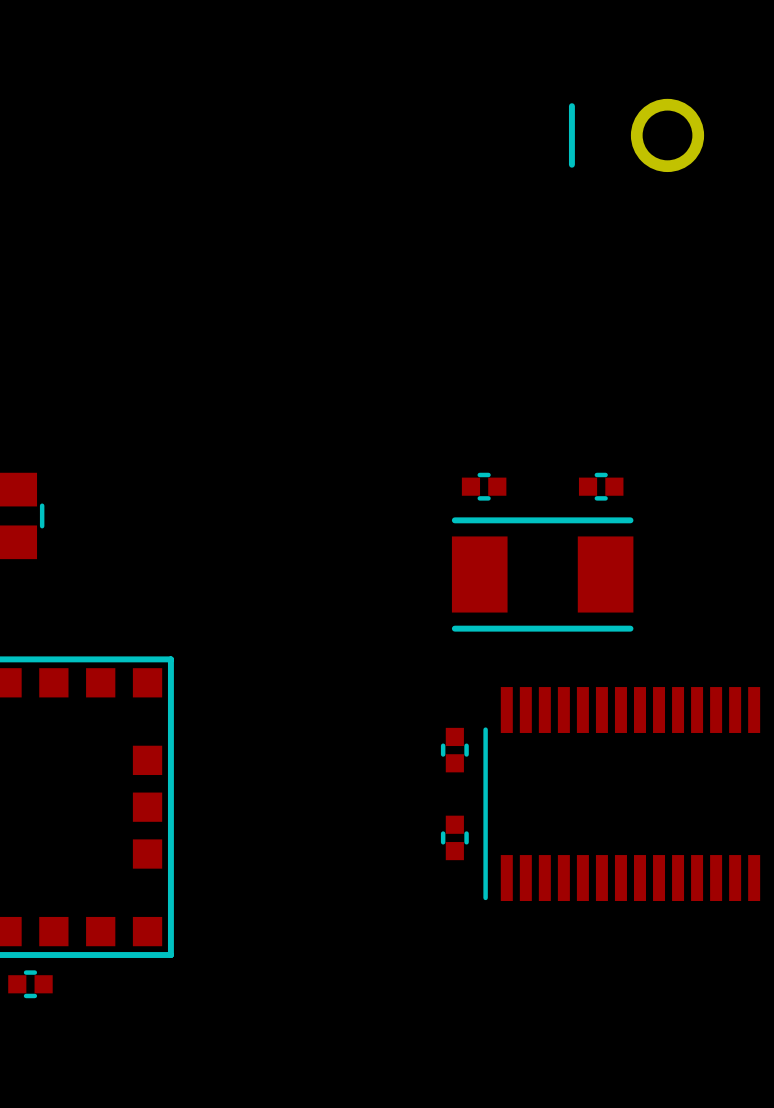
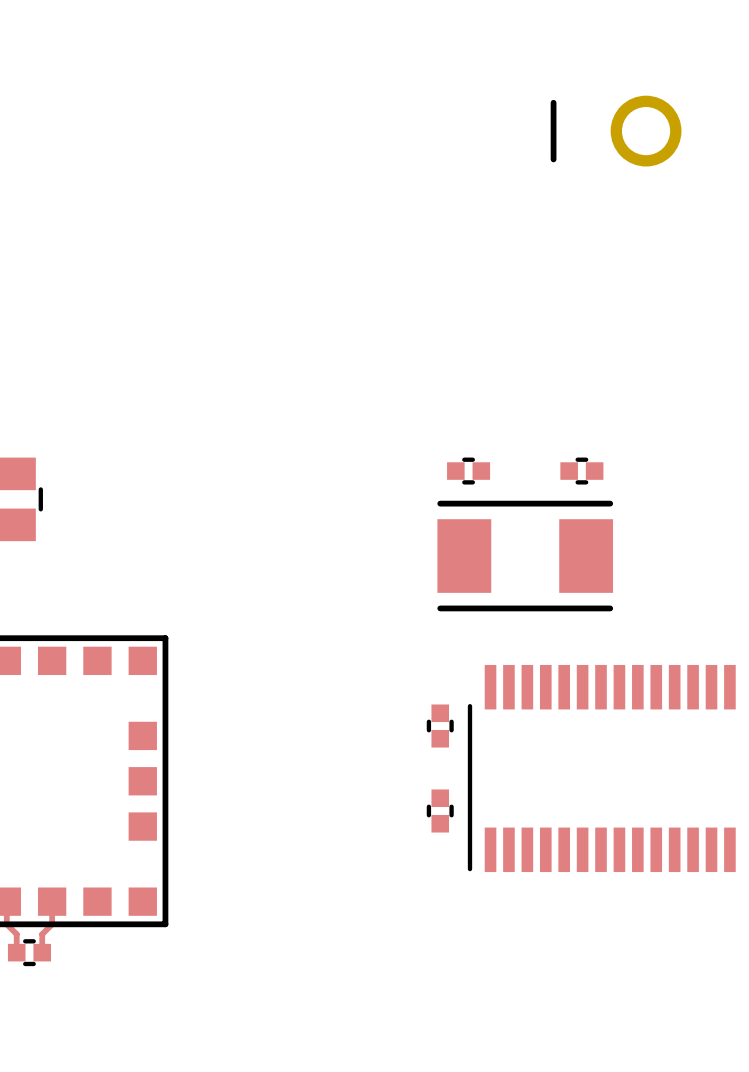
top track: none -> (6, 901) (6, 924) (16, 934) (16, 952)
top track: none -> (52, 901) (52, 924) (42, 934) (42, 952)

